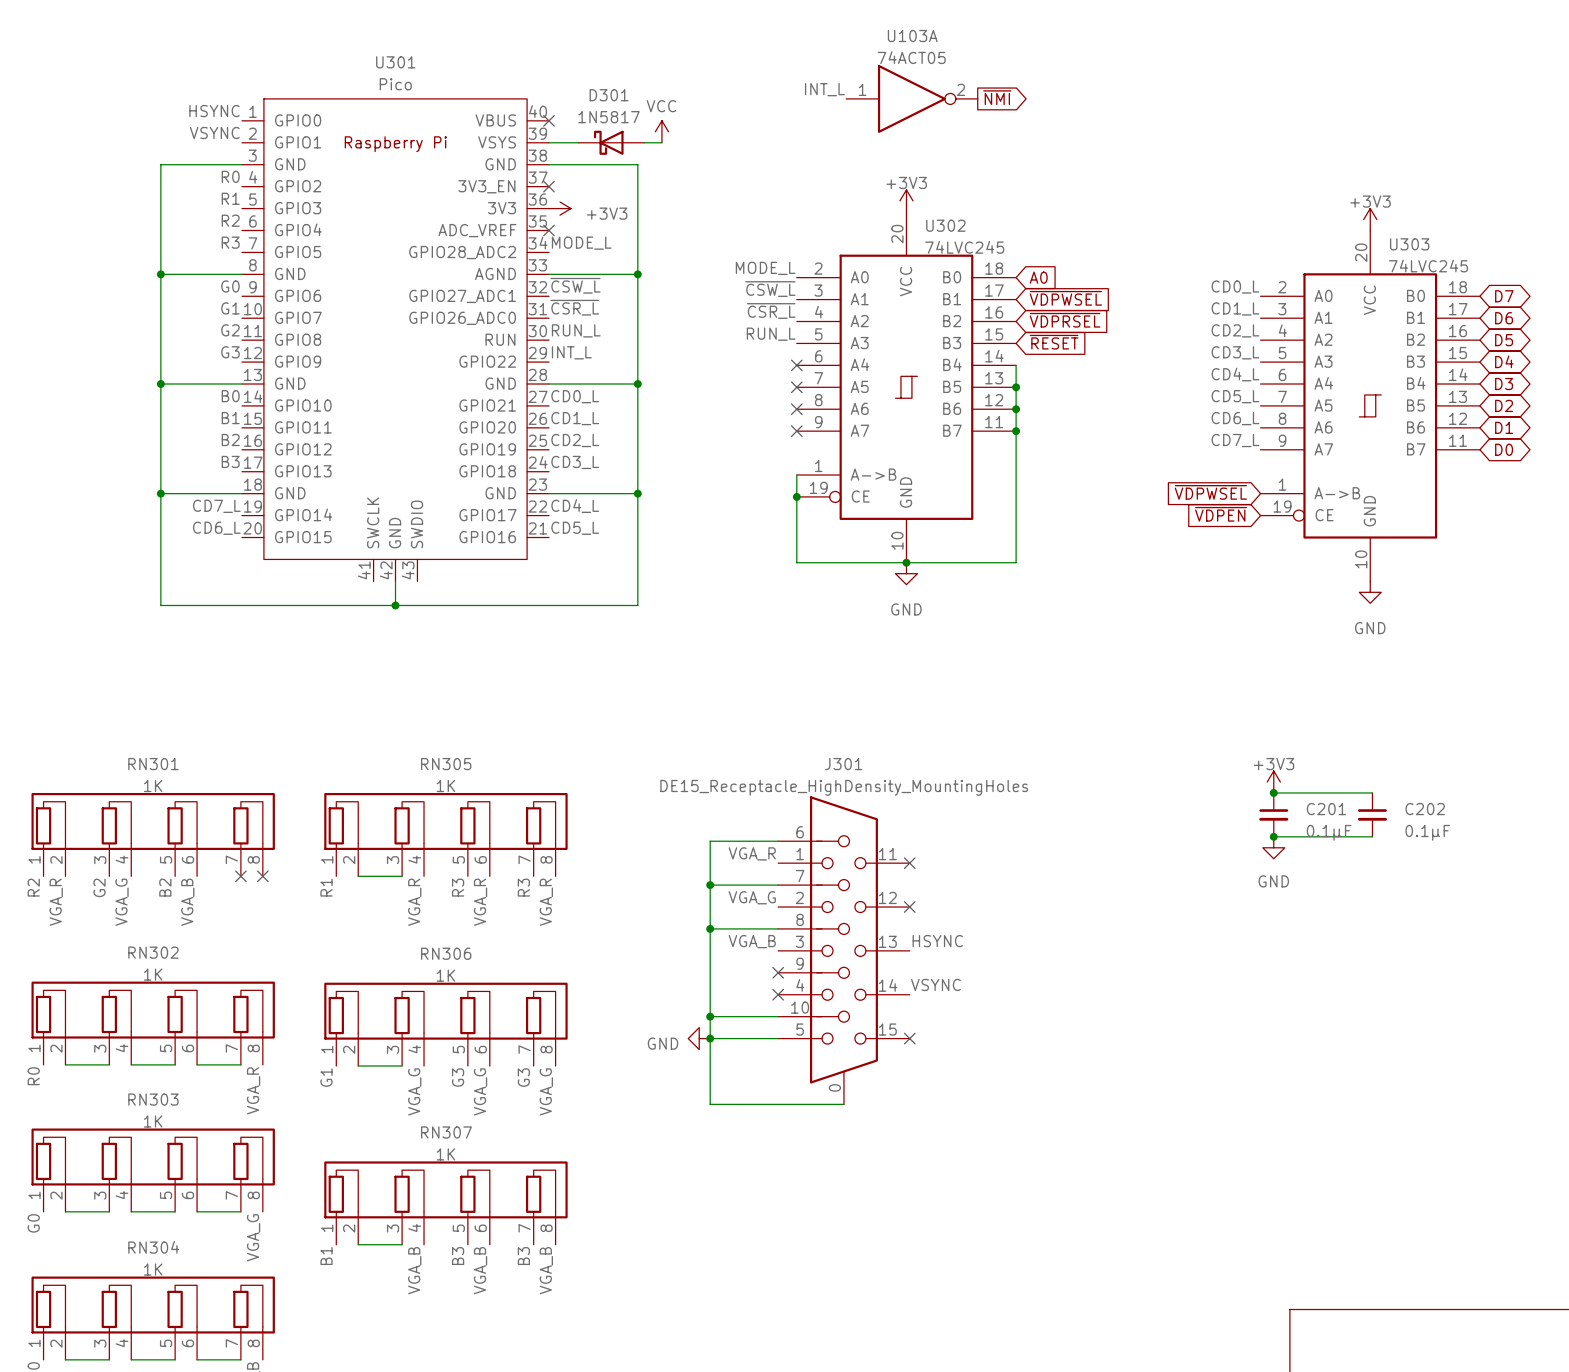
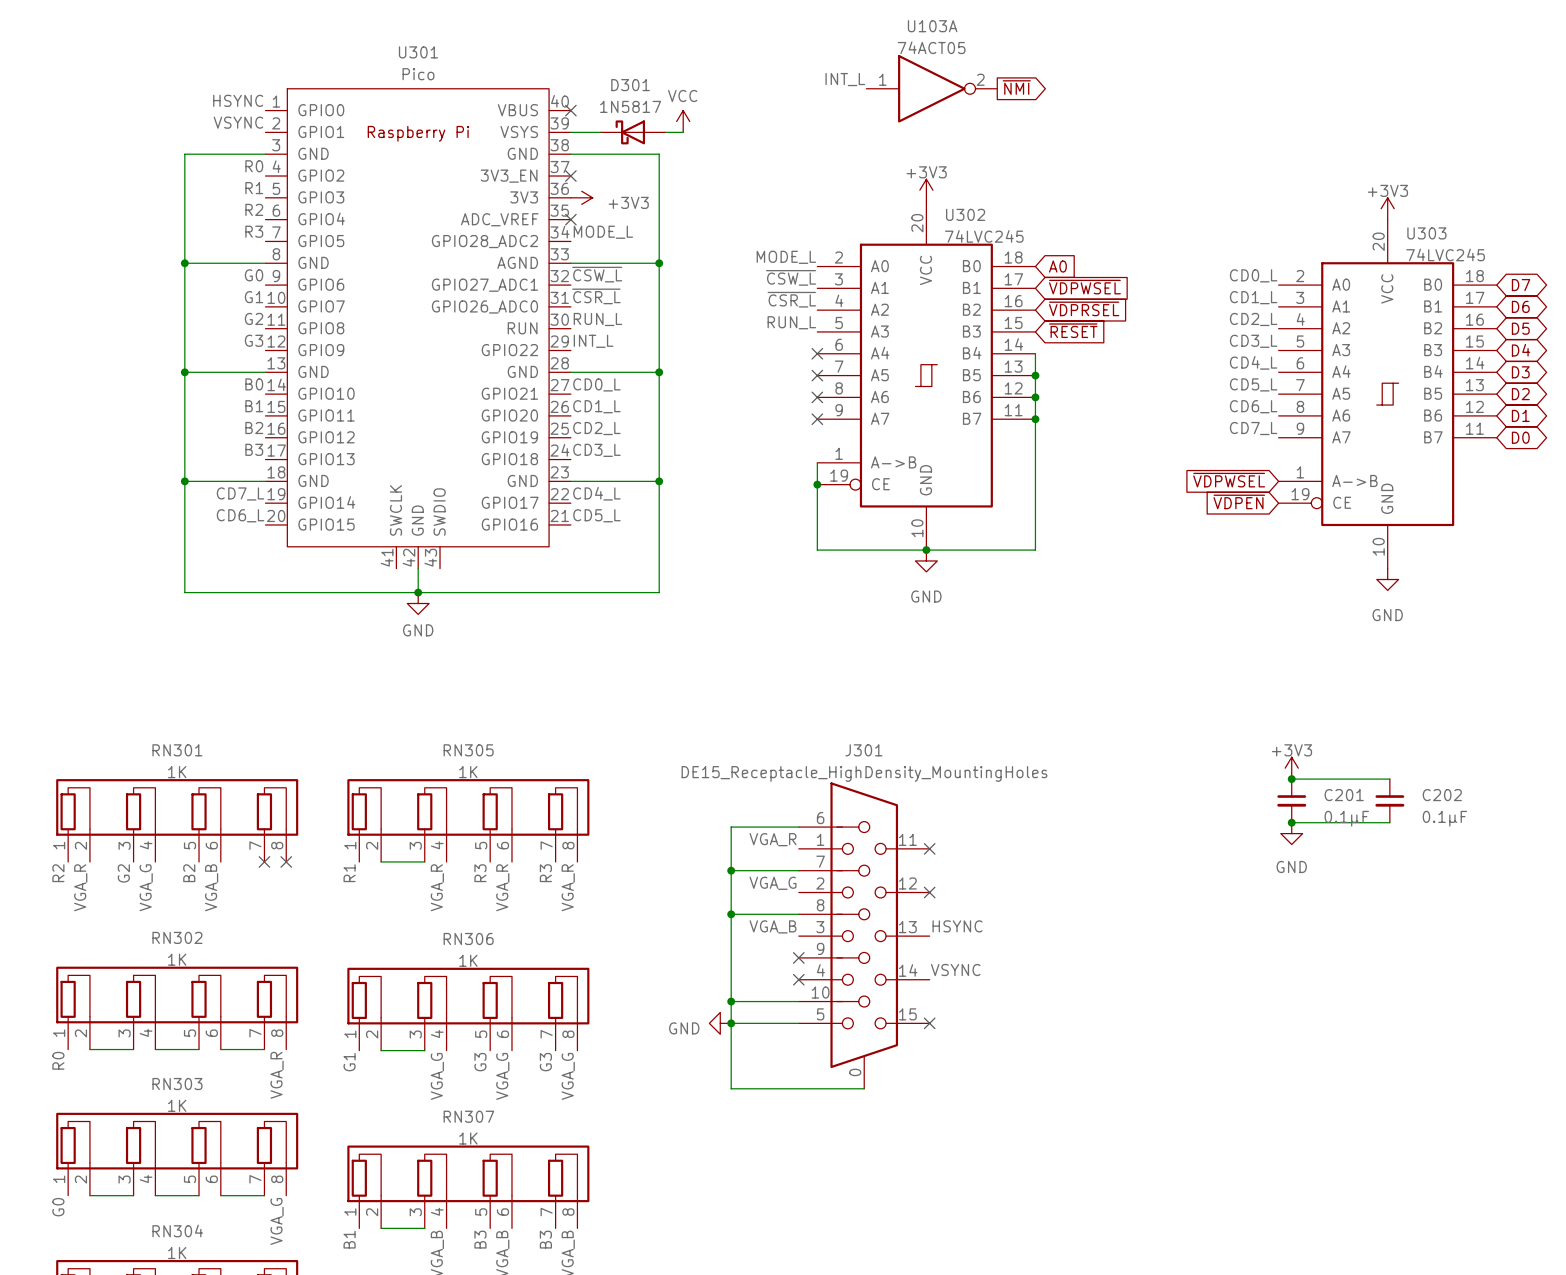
power symbol: none -> GND (418, 603)

